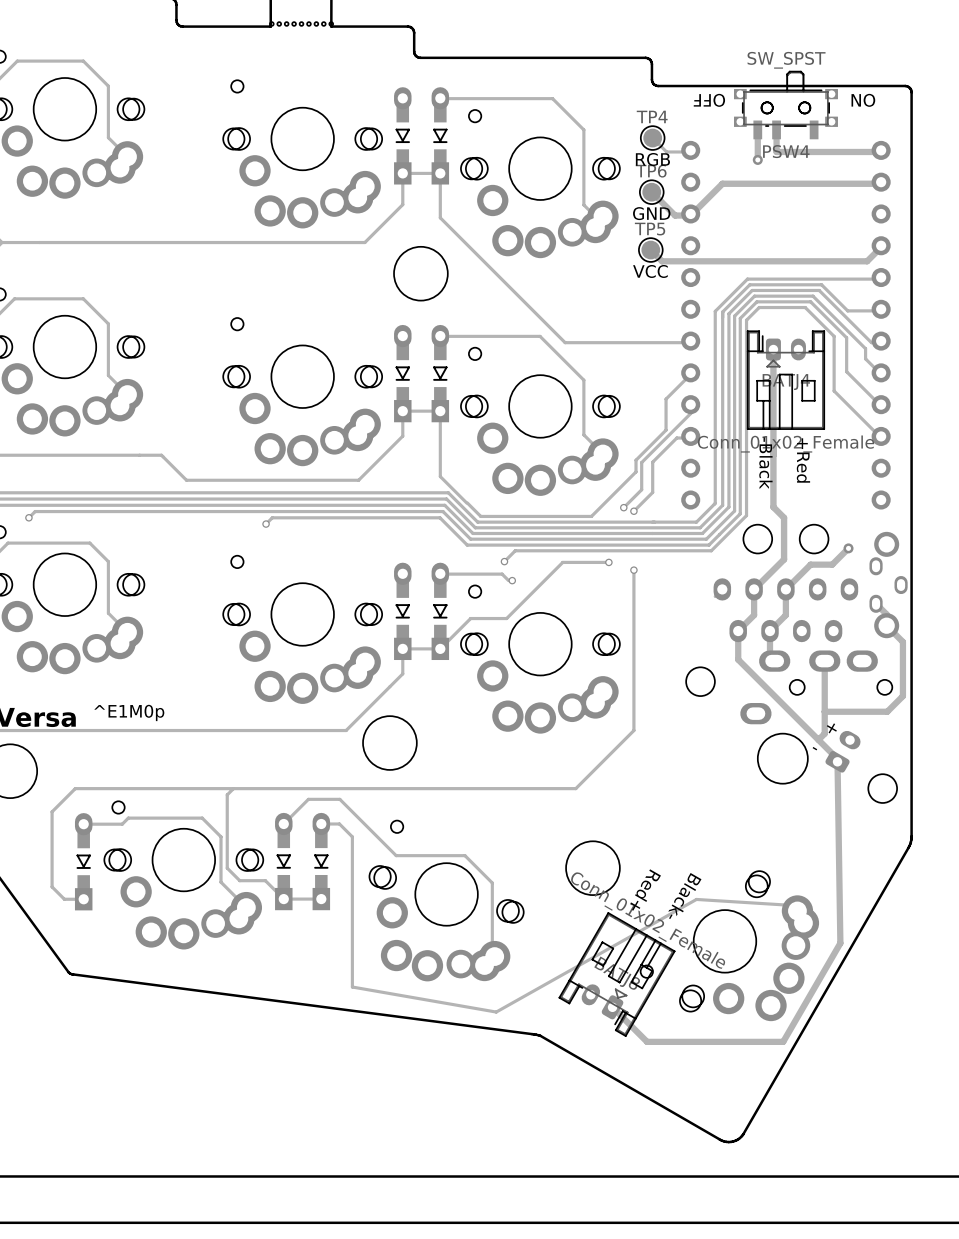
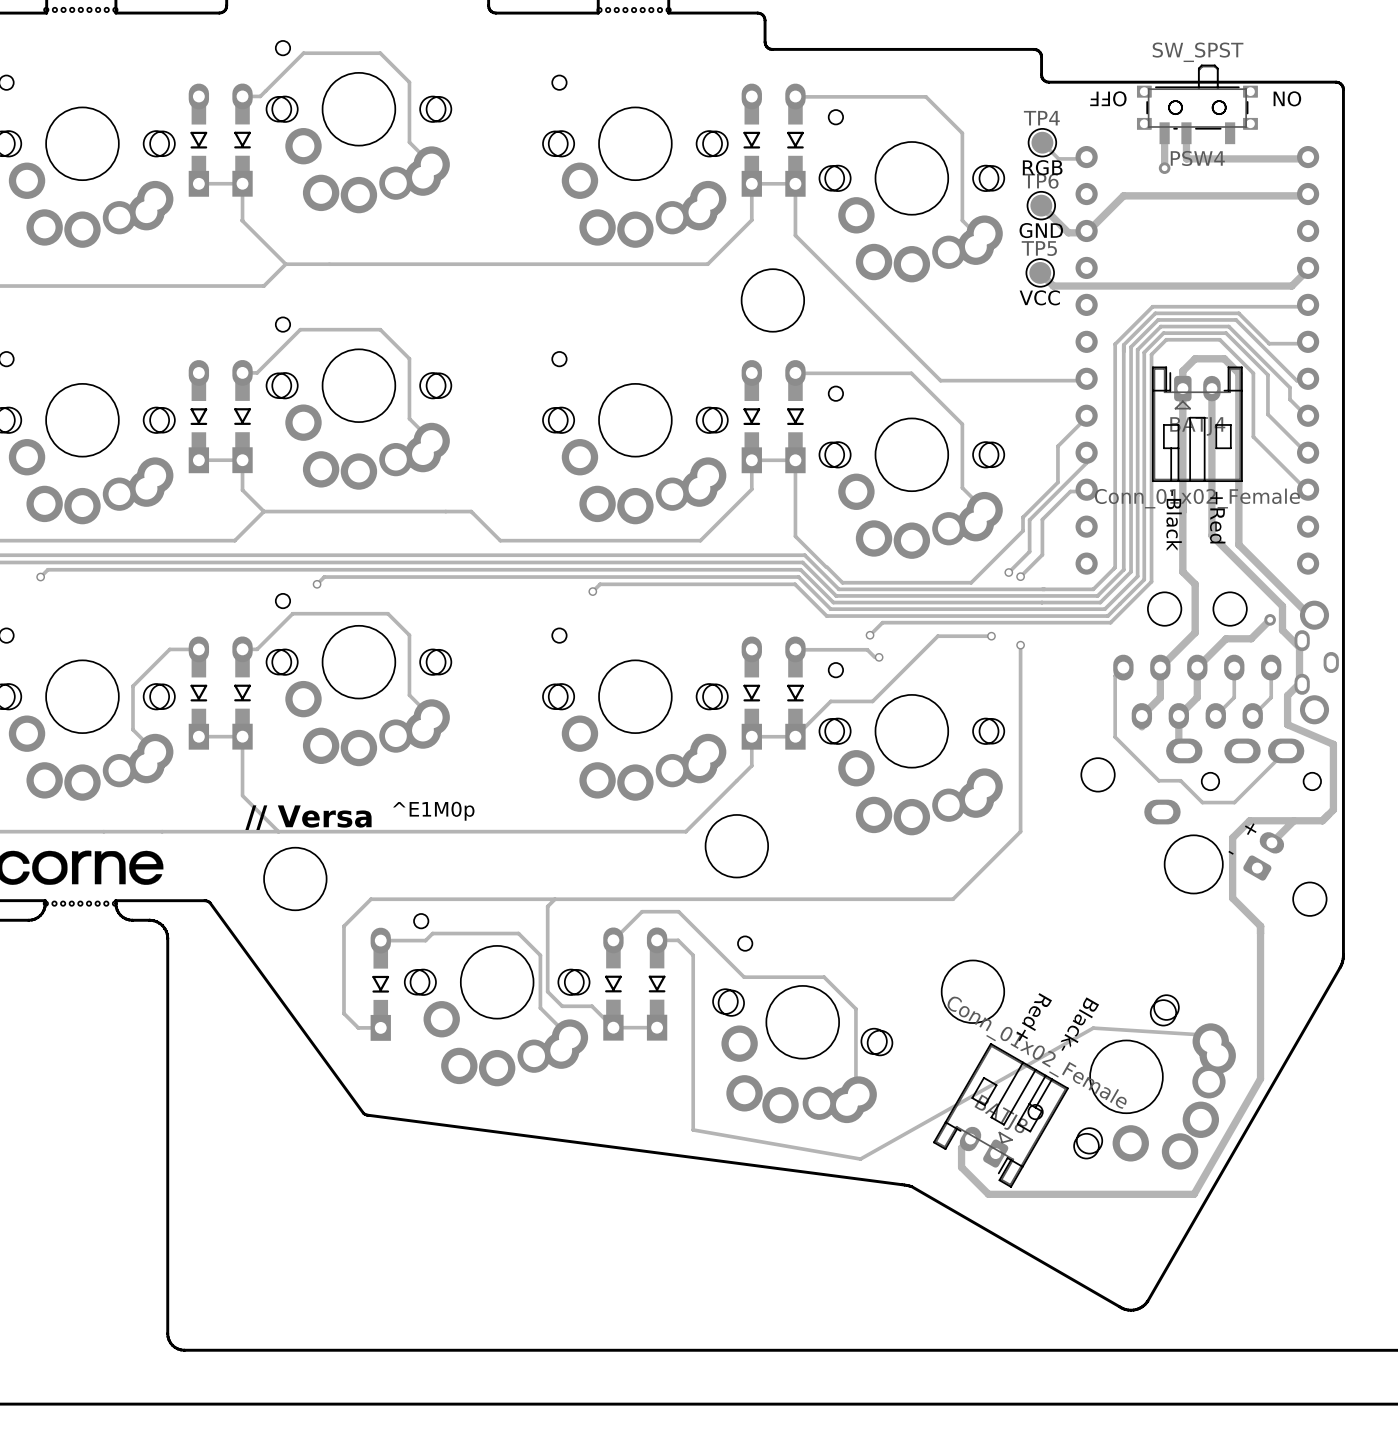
track: none -> (1182, 388) (1182, 371) (1195, 358) (1224, 358) (1238, 373) (1238, 544) (1309, 615)
track: none -> (1234, 667) (1234, 697) (1215, 716)
track: none -> (1271, 667) (1271, 697) (1252, 716)
track: none -> (1115, 675) (1115, 737) (1158, 780) (1180, 780) (1202, 802) (1234, 802) (1286, 750)
track: (876, 603) (886, 614) (886, 625) (902, 641) (902, 655) -> (1211, 388) (1211, 535) (1282, 606) (1282, 630) (1299, 647) (1299, 683) (1287, 695) (1287, 724) (1333, 744)
track: (738, 640) (738, 659) (837, 758) (840, 943) (783, 1041) (647, 1041) (612, 1007) -> none
track: (824, 661) (824, 733) (818, 739) -> none
track: (902, 696) (887, 711) (824, 711) -> (1333, 791) (1333, 809) (1322, 820) (1249, 820) (1232, 837) (1232, 898) (1260, 926) (1260, 1078) (1194, 1194) (988, 1194) (961, 1167) (961, 1147) (970, 1139)
track: none -> (1293, 820) (1271, 842)

